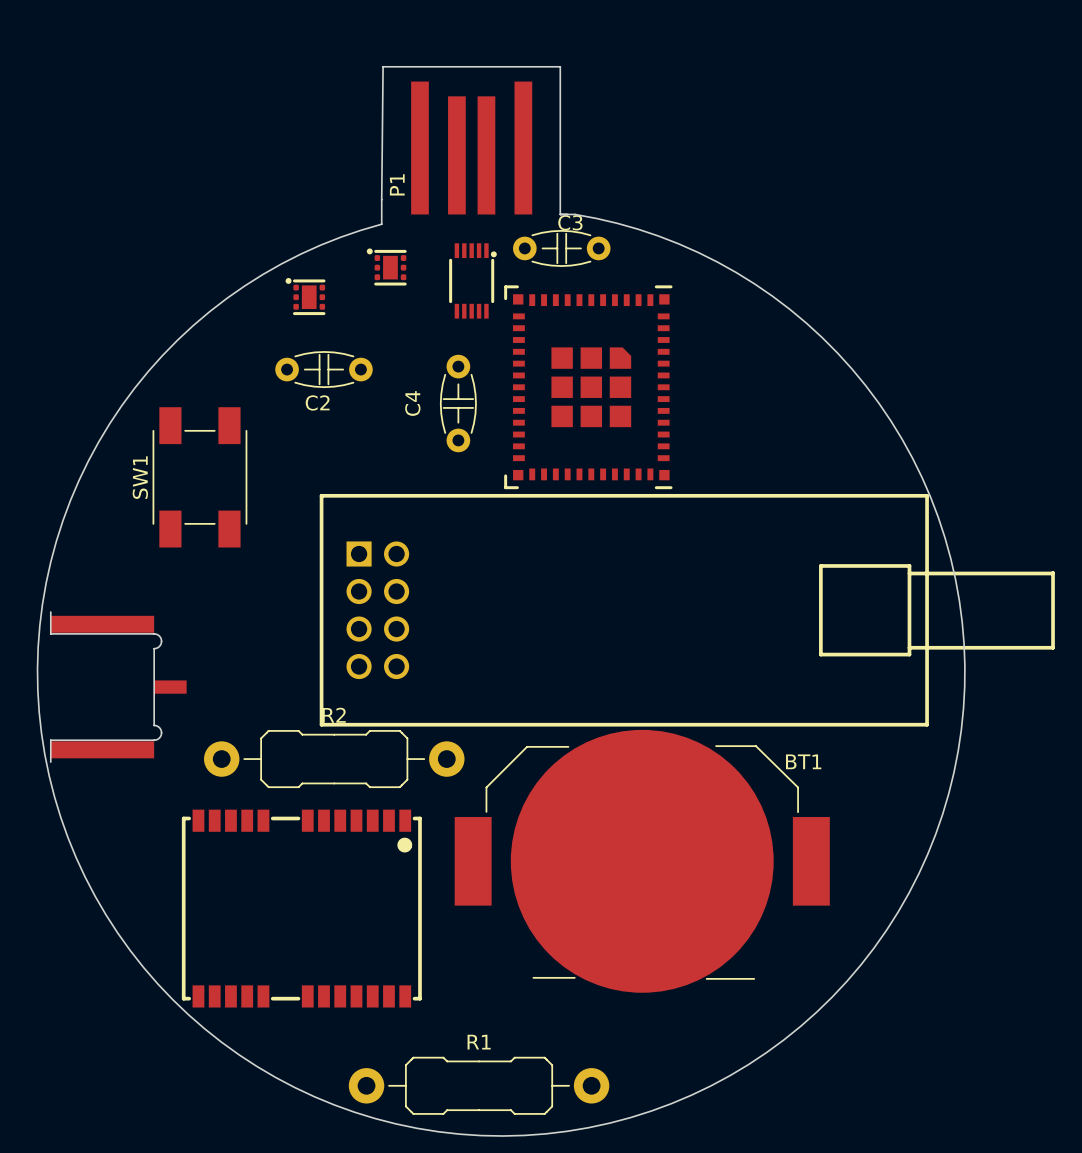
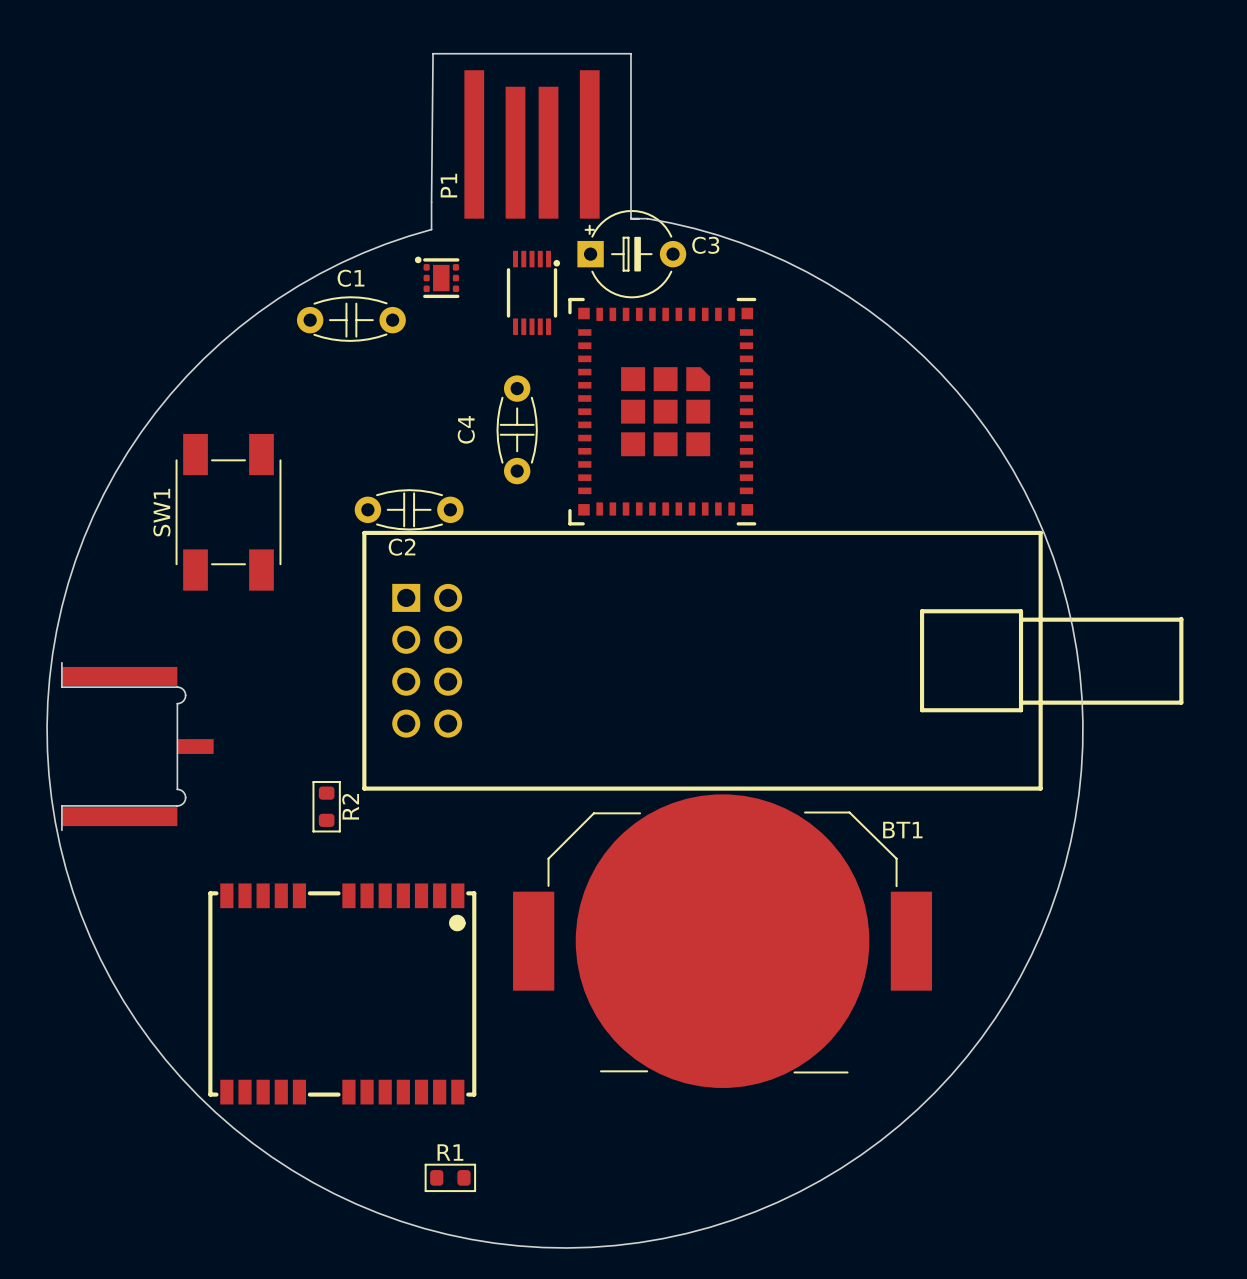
C3 name position: C3 (570, 222) -> C3 (705, 245)
C3 footprint: [513, 229, 611, 267] -> [577, 209, 687, 299]
part: (305, 296) -> none
C1: none -> (351, 319)
C2 position: (324, 369) -> (409, 509)
R2 name position: R2 (334, 715) -> R2 (350, 806)
R2 footprint: [204, 730, 465, 789] -> [312, 781, 341, 833]
R1 footprint: [348, 1056, 610, 1115] -> [424, 1163, 477, 1193]

